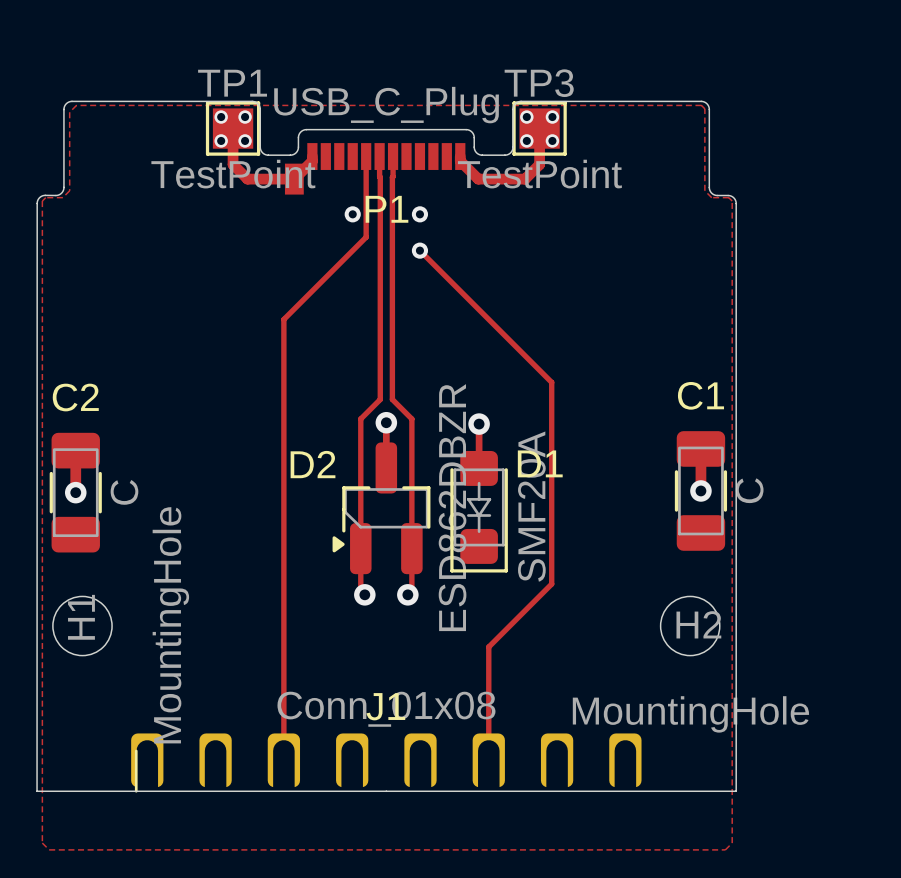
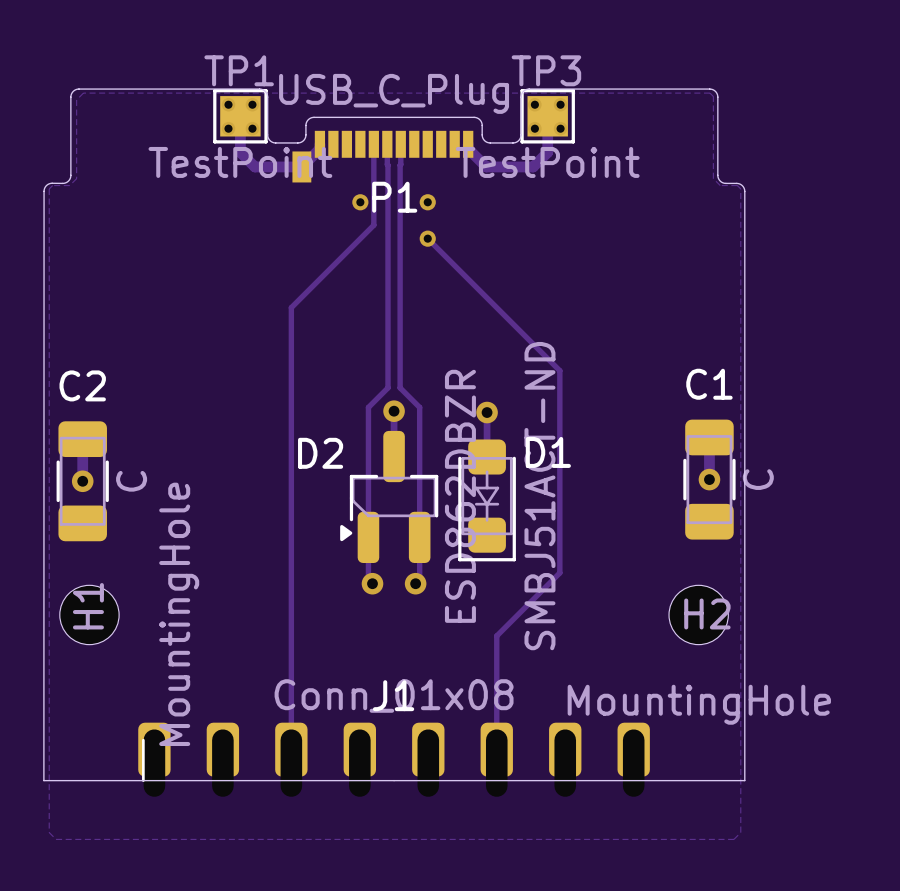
D1 value: SMF20A (531, 506) -> SMBJ51ACT-ND (539, 496)

